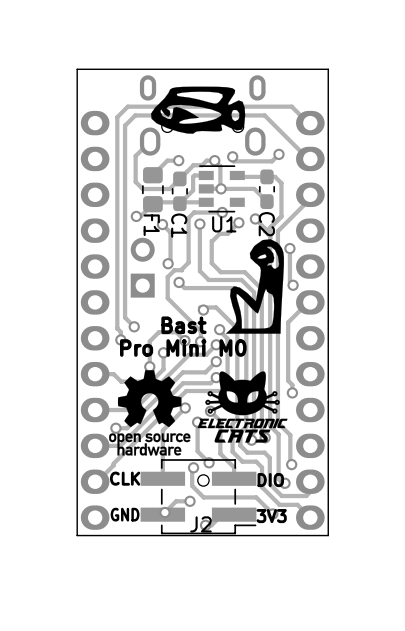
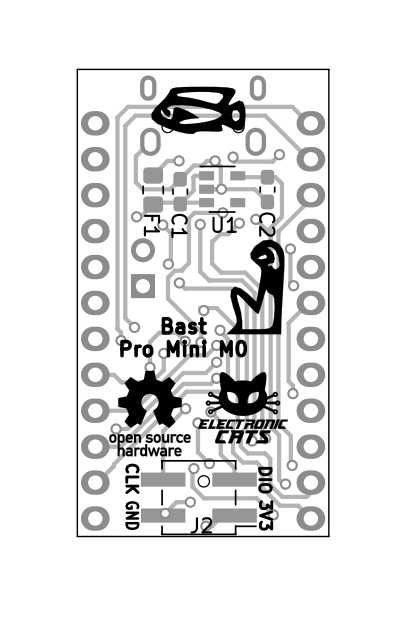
text rotation: 0° (125, 478) -> 90° clockwise (132, 478)
text rotation: 0° (270, 480) -> 90° clockwise (265, 480)
text rotation: 0° (125, 514) -> 90° clockwise (132, 515)
text rotation: 0° (271, 516) -> 90° clockwise (266, 515)

